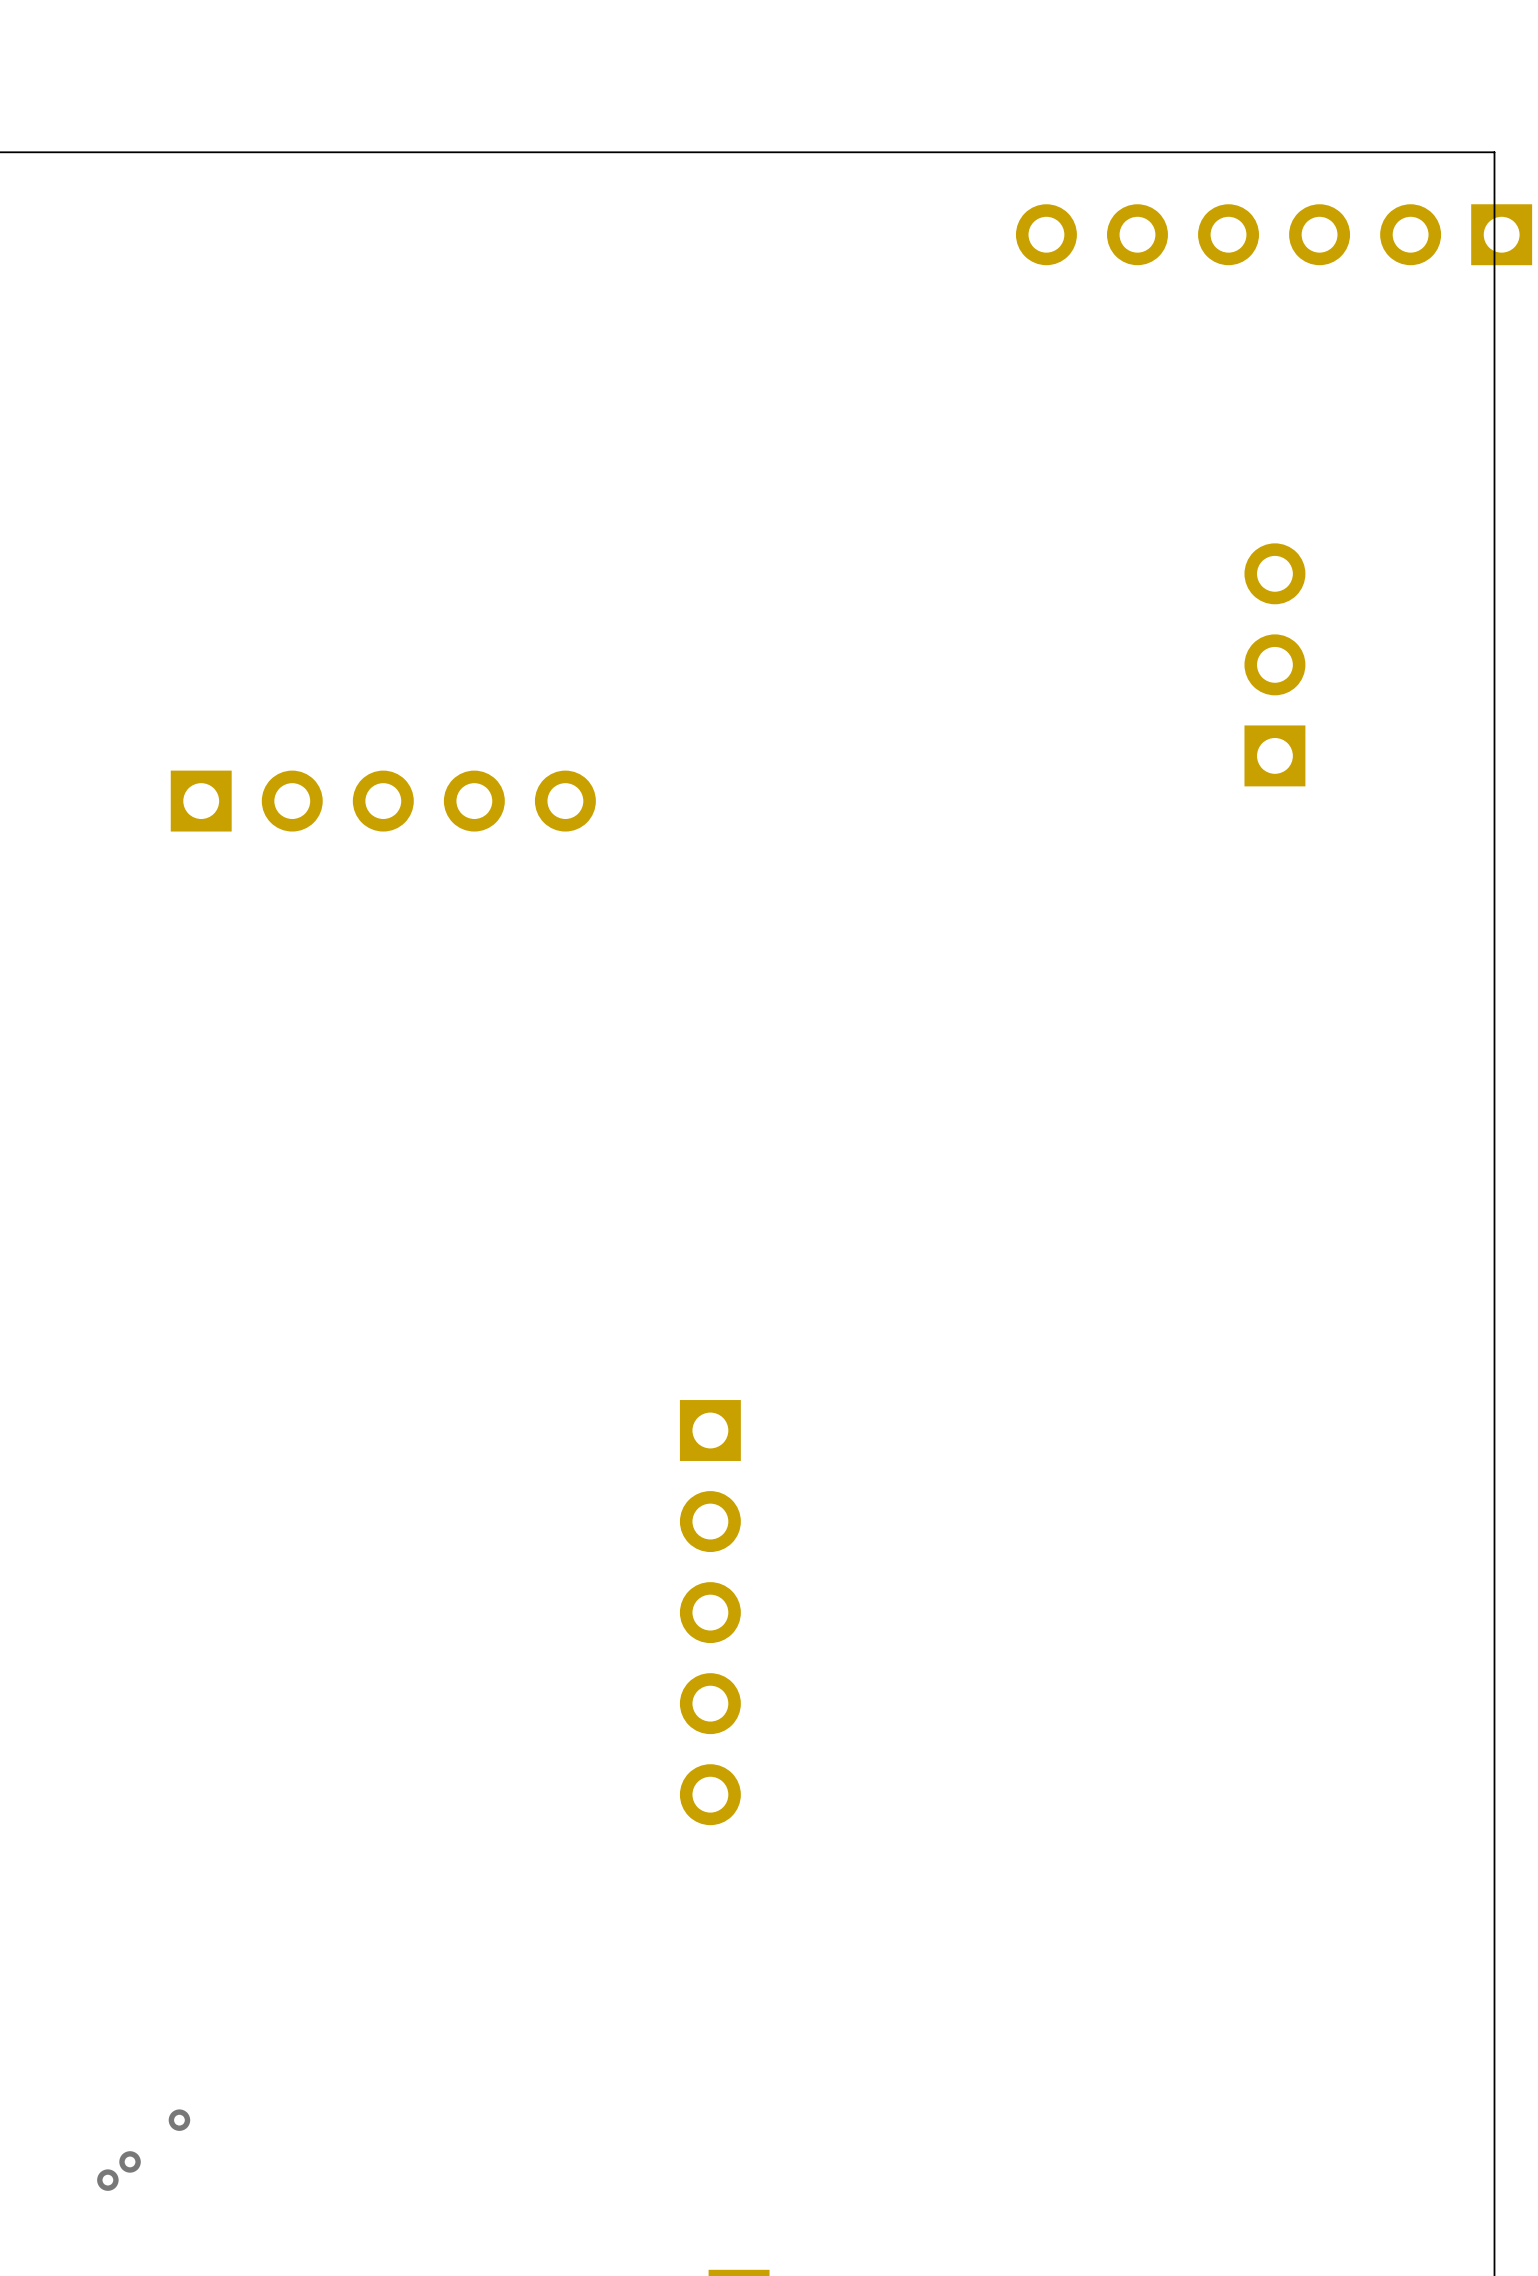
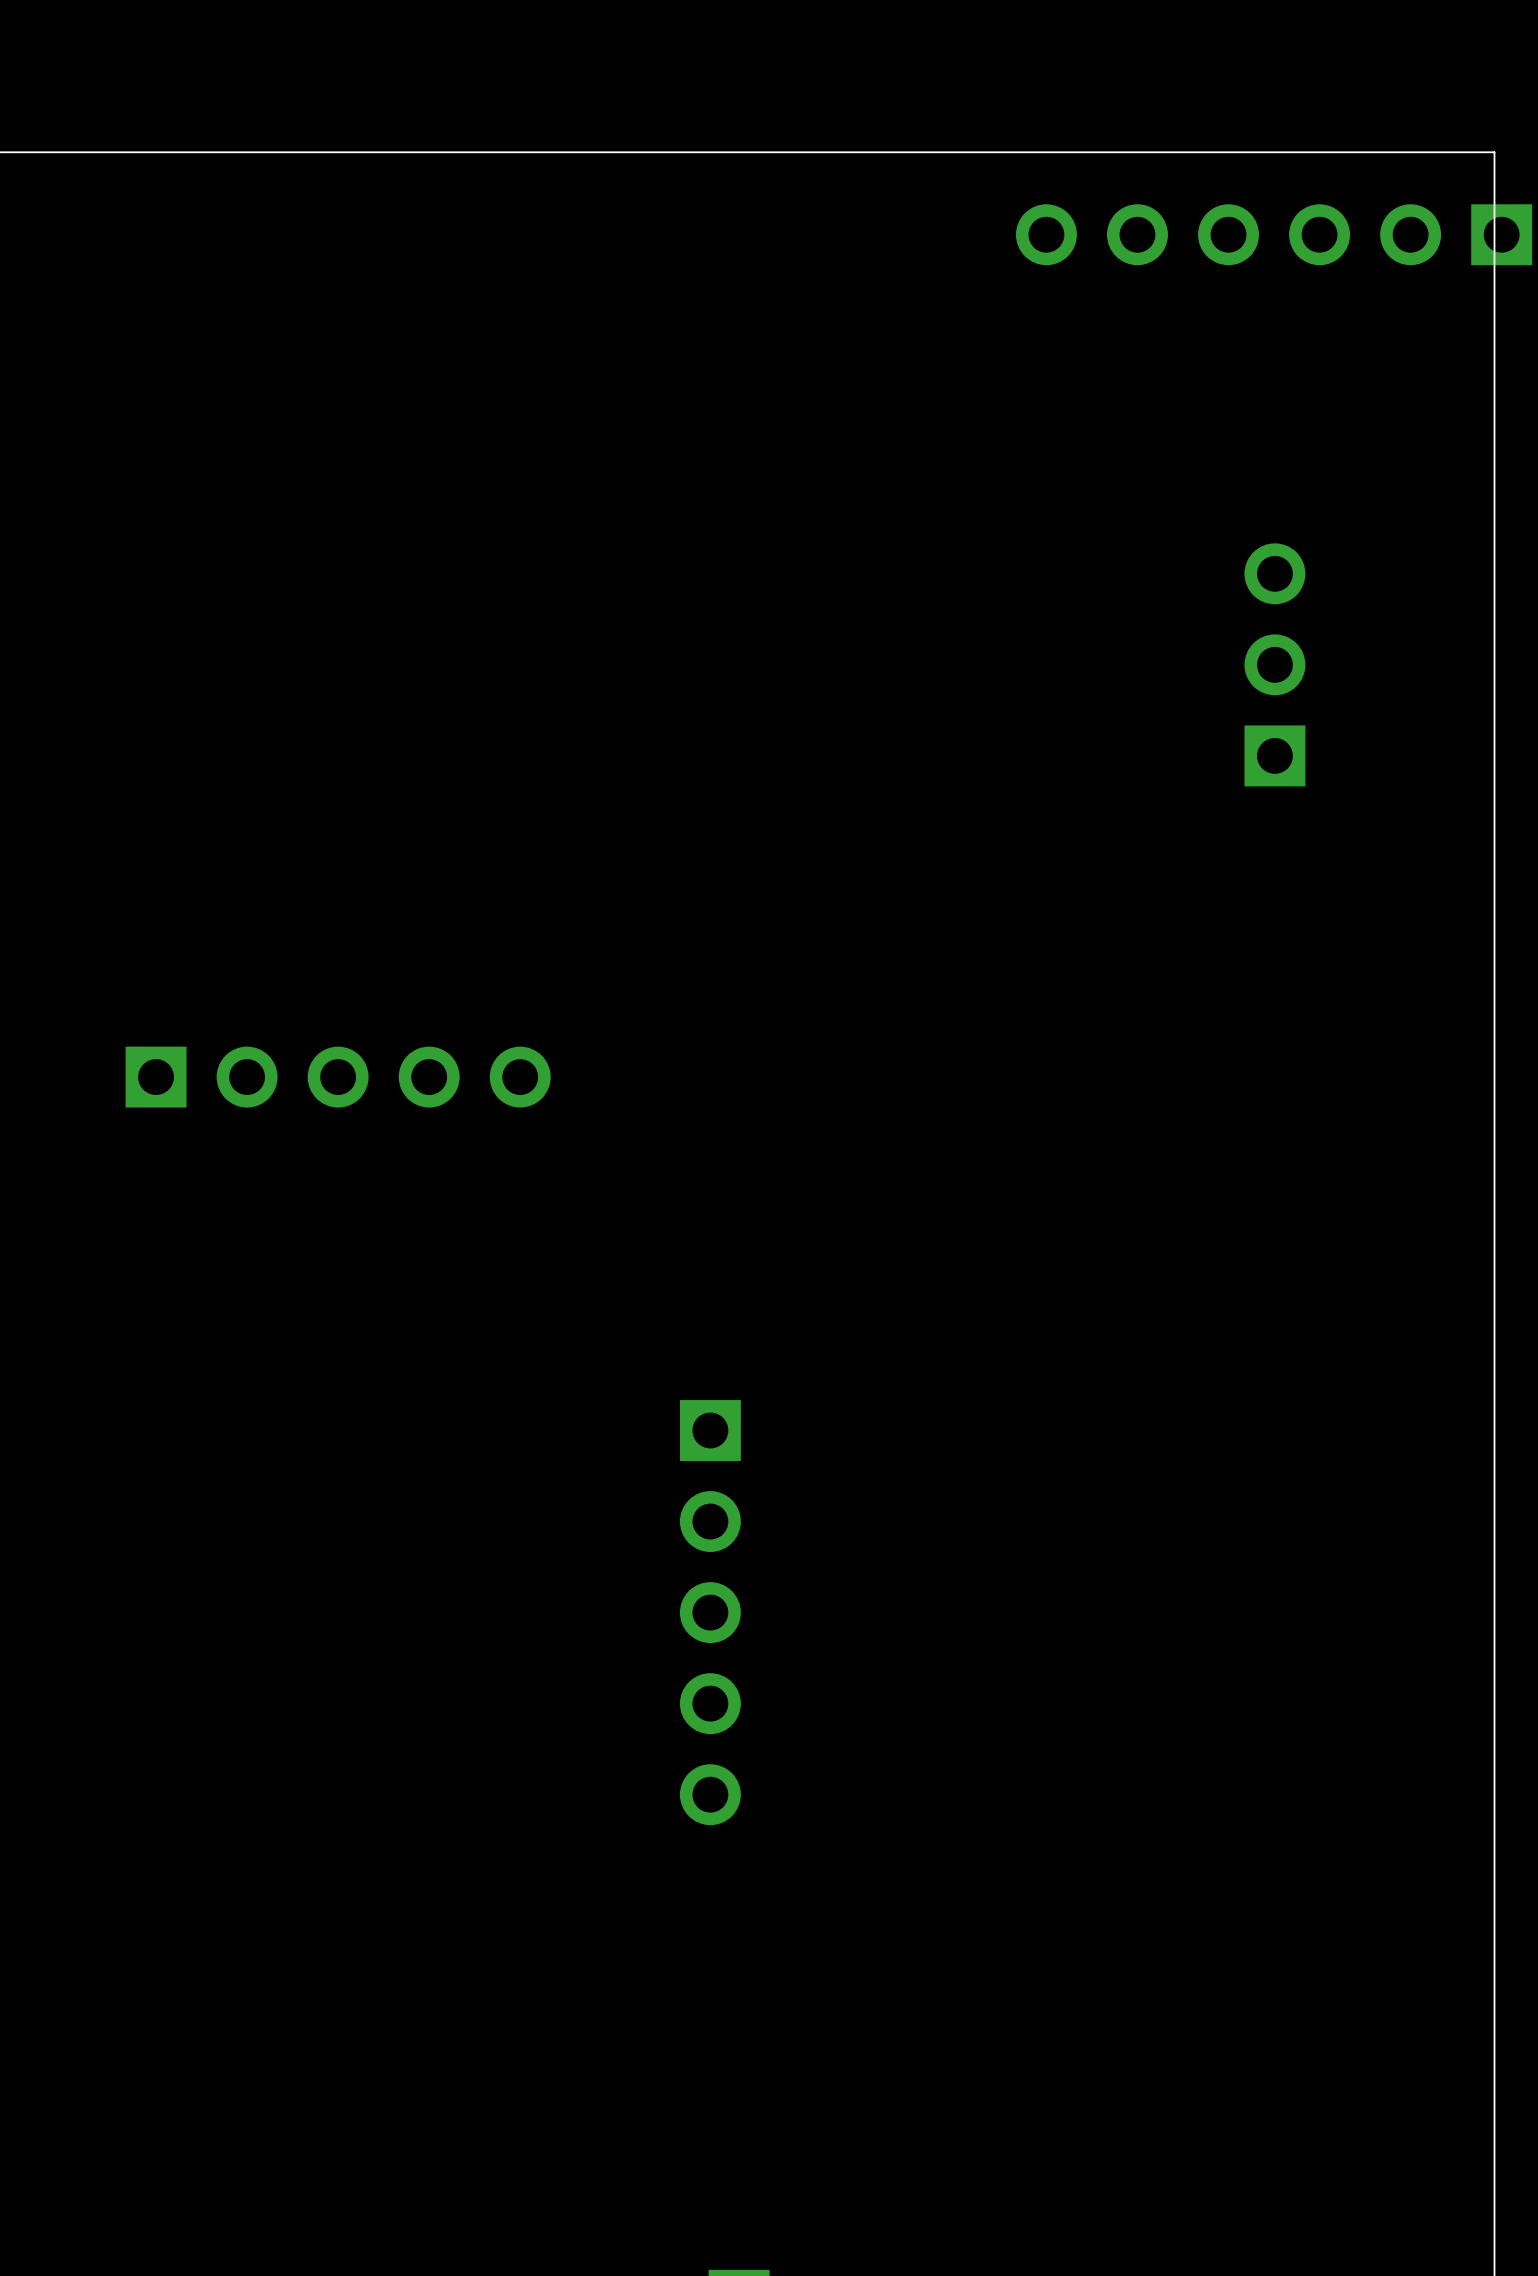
part position: (383, 801) -> (338, 1077)
via: (179, 2120) -> none
via: (130, 2161) -> none
via: (107, 2180) -> none

